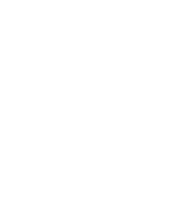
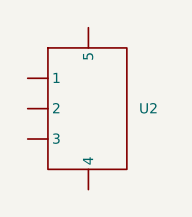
U2: none -> (77, 108)

